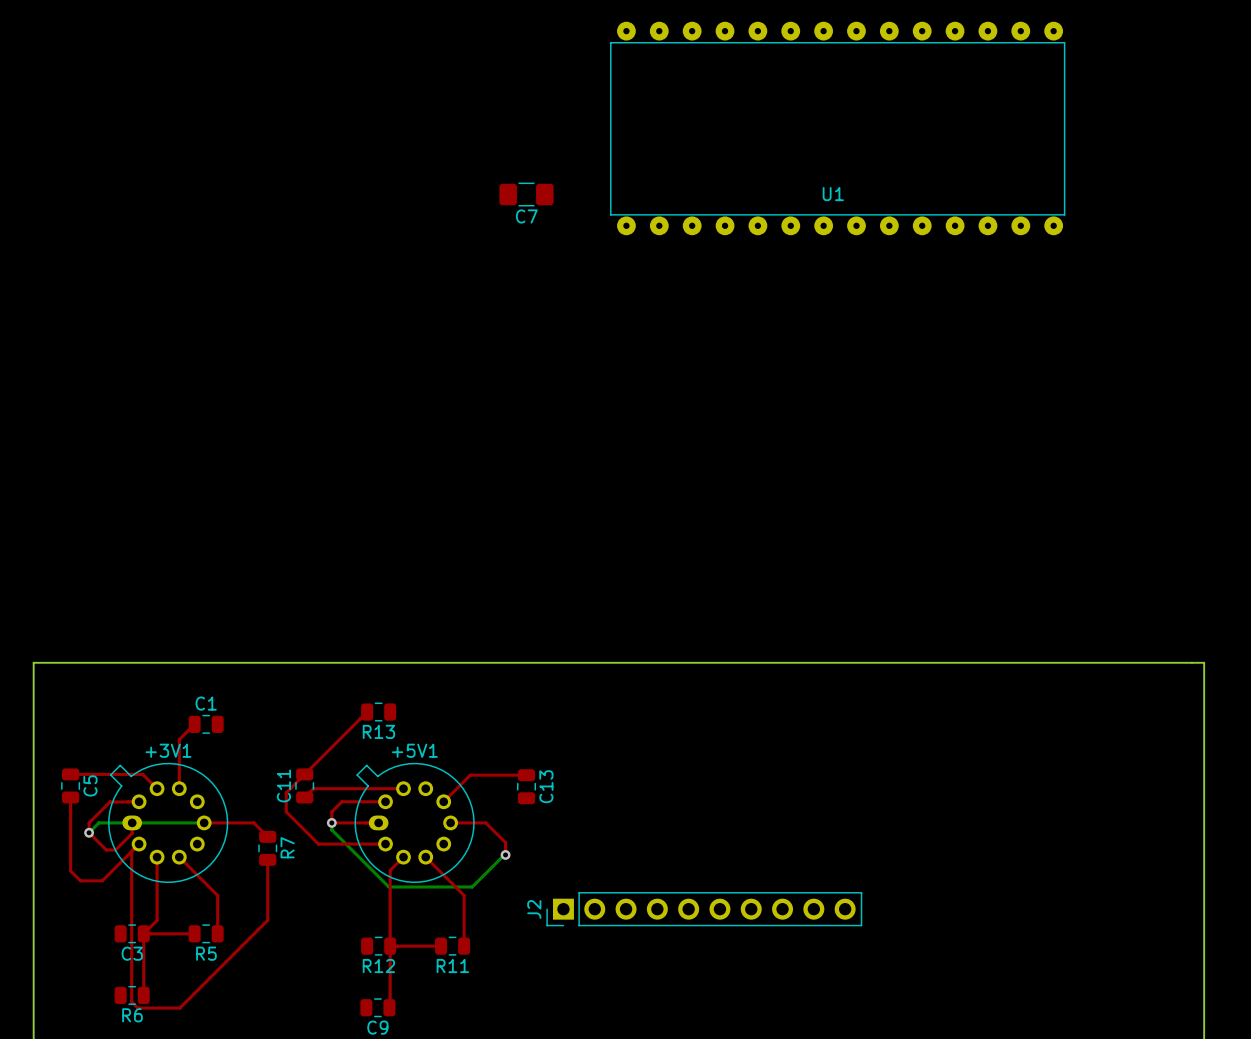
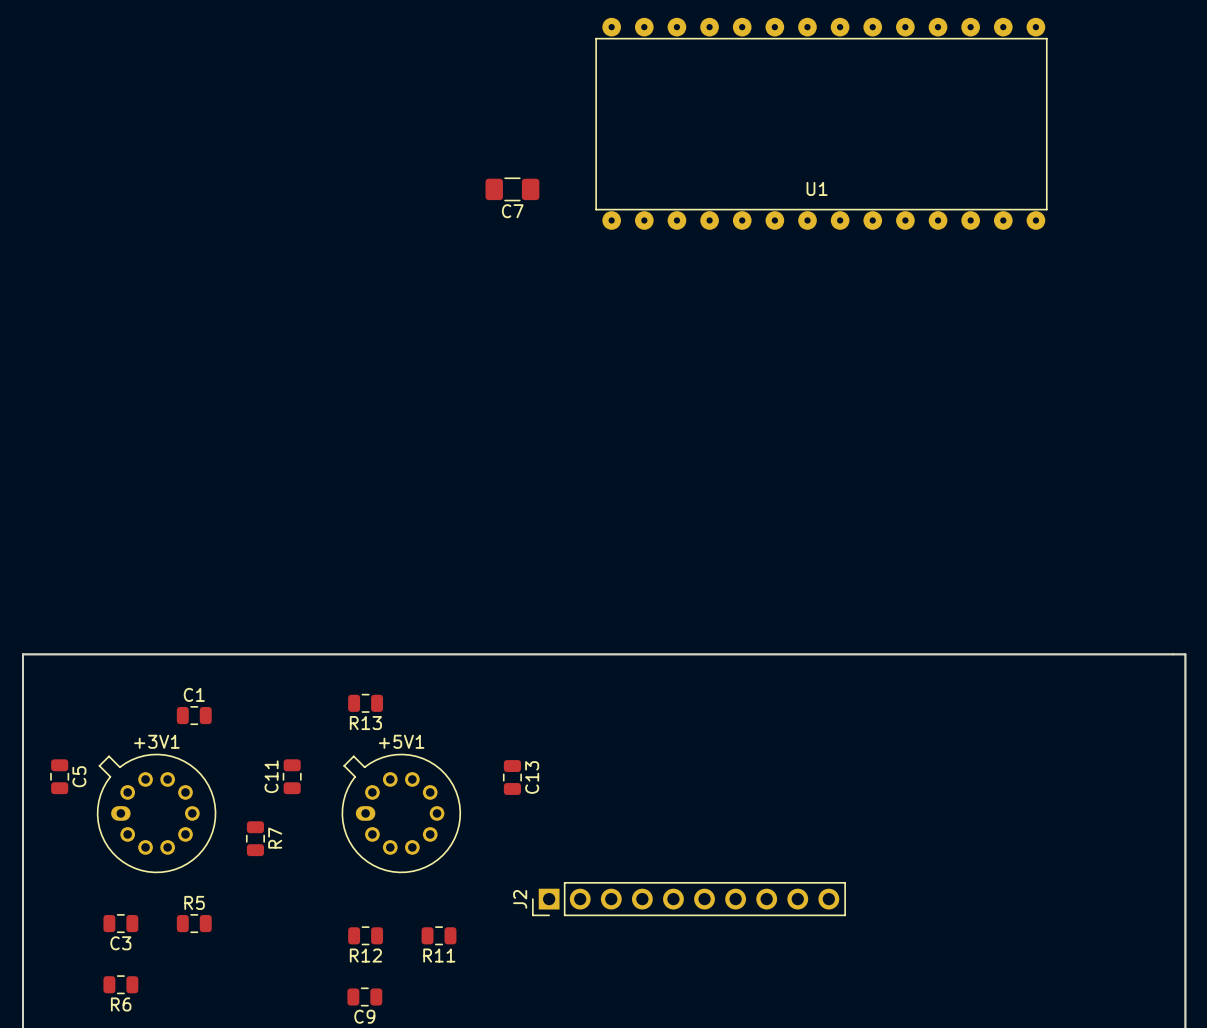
top track: (367, 712) (286, 792) (286, 811) (318, 844) (385, 844) -> none
top track: (194, 724) (179, 739) (179, 788) -> none
top track: (70, 774) (142, 774) (157, 788) -> none
top track: (526, 775) (470, 775) (443, 801) -> none
top track: (403, 788) (313, 788) (304, 797) -> none
top track: (70, 797) (70, 870) (80, 880) (102, 880) (139, 844) -> none
top track: (139, 801) (110, 801) (89, 822) (89, 832) (106, 850) (115, 850) (132, 833) (132, 822) -> none
top track: (385, 801) (341, 801) (331, 811) (331, 822) (378, 822) -> none
top track: (204, 822) (253, 822) (267, 836) -> none
bottom track: (204, 822) (98, 822) (89, 832) -> none
bottom track: (331, 822) (331, 829) (388, 886) (472, 886) (505, 854) -> none
via: (331, 822) -> none
top track: (450, 822) (485, 822) (505, 842) (505, 854) -> none
via: (89, 832) -> none
top track: (131, 851) (131, 1001) (137, 1008) (179, 1008) (267, 920) (267, 859) -> none
via: (505, 854) -> none
top track: (157, 857) (157, 920) (143, 933) -> none
top track: (179, 857) (217, 895) (217, 933) -> none
top track: (403, 857) (390, 870) (389, 1007) -> none
top track: (425, 857) (464, 895) (464, 946) -> none
top track: (143, 933) (143, 995) -> none
top track: (143, 933) (194, 933) -> none
top track: (390, 946) (441, 946) -> none
R5 name position: R5 (206, 953) -> R5 (194, 902)

